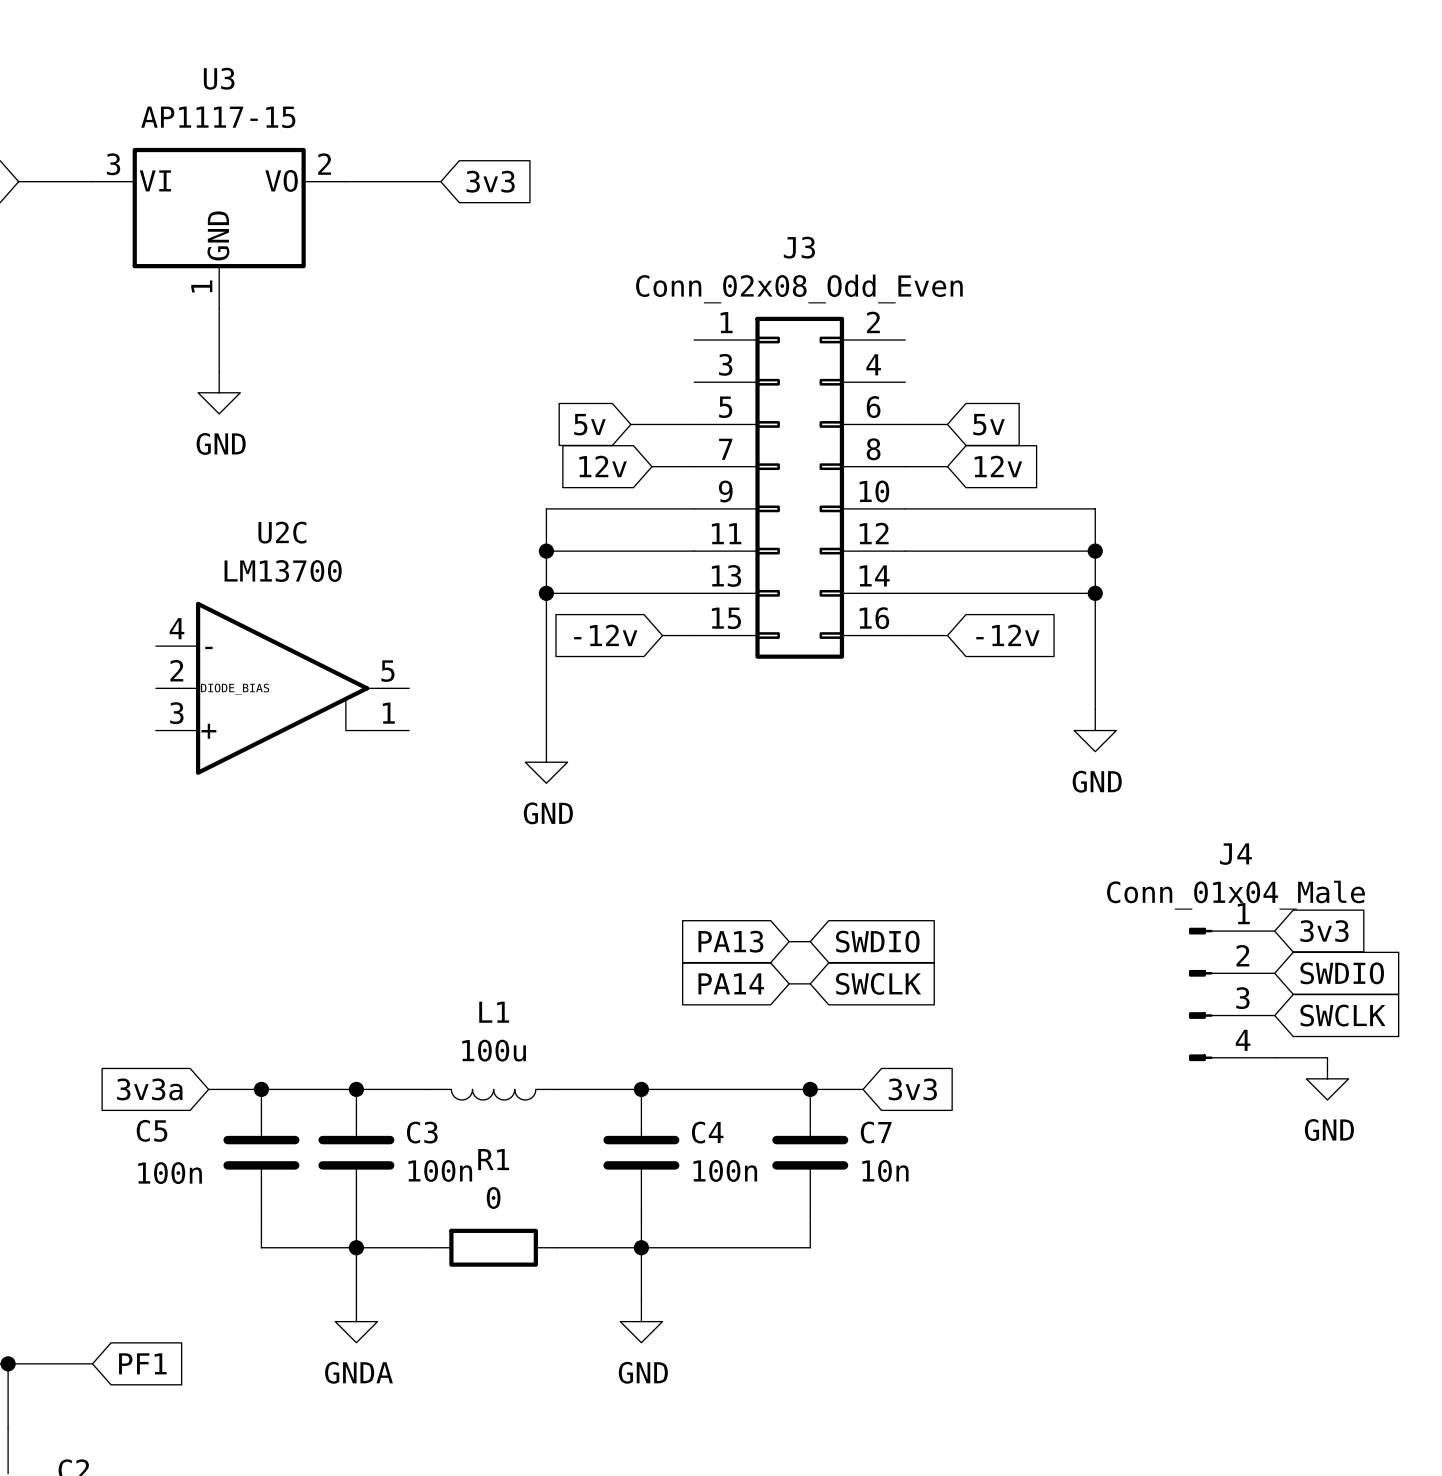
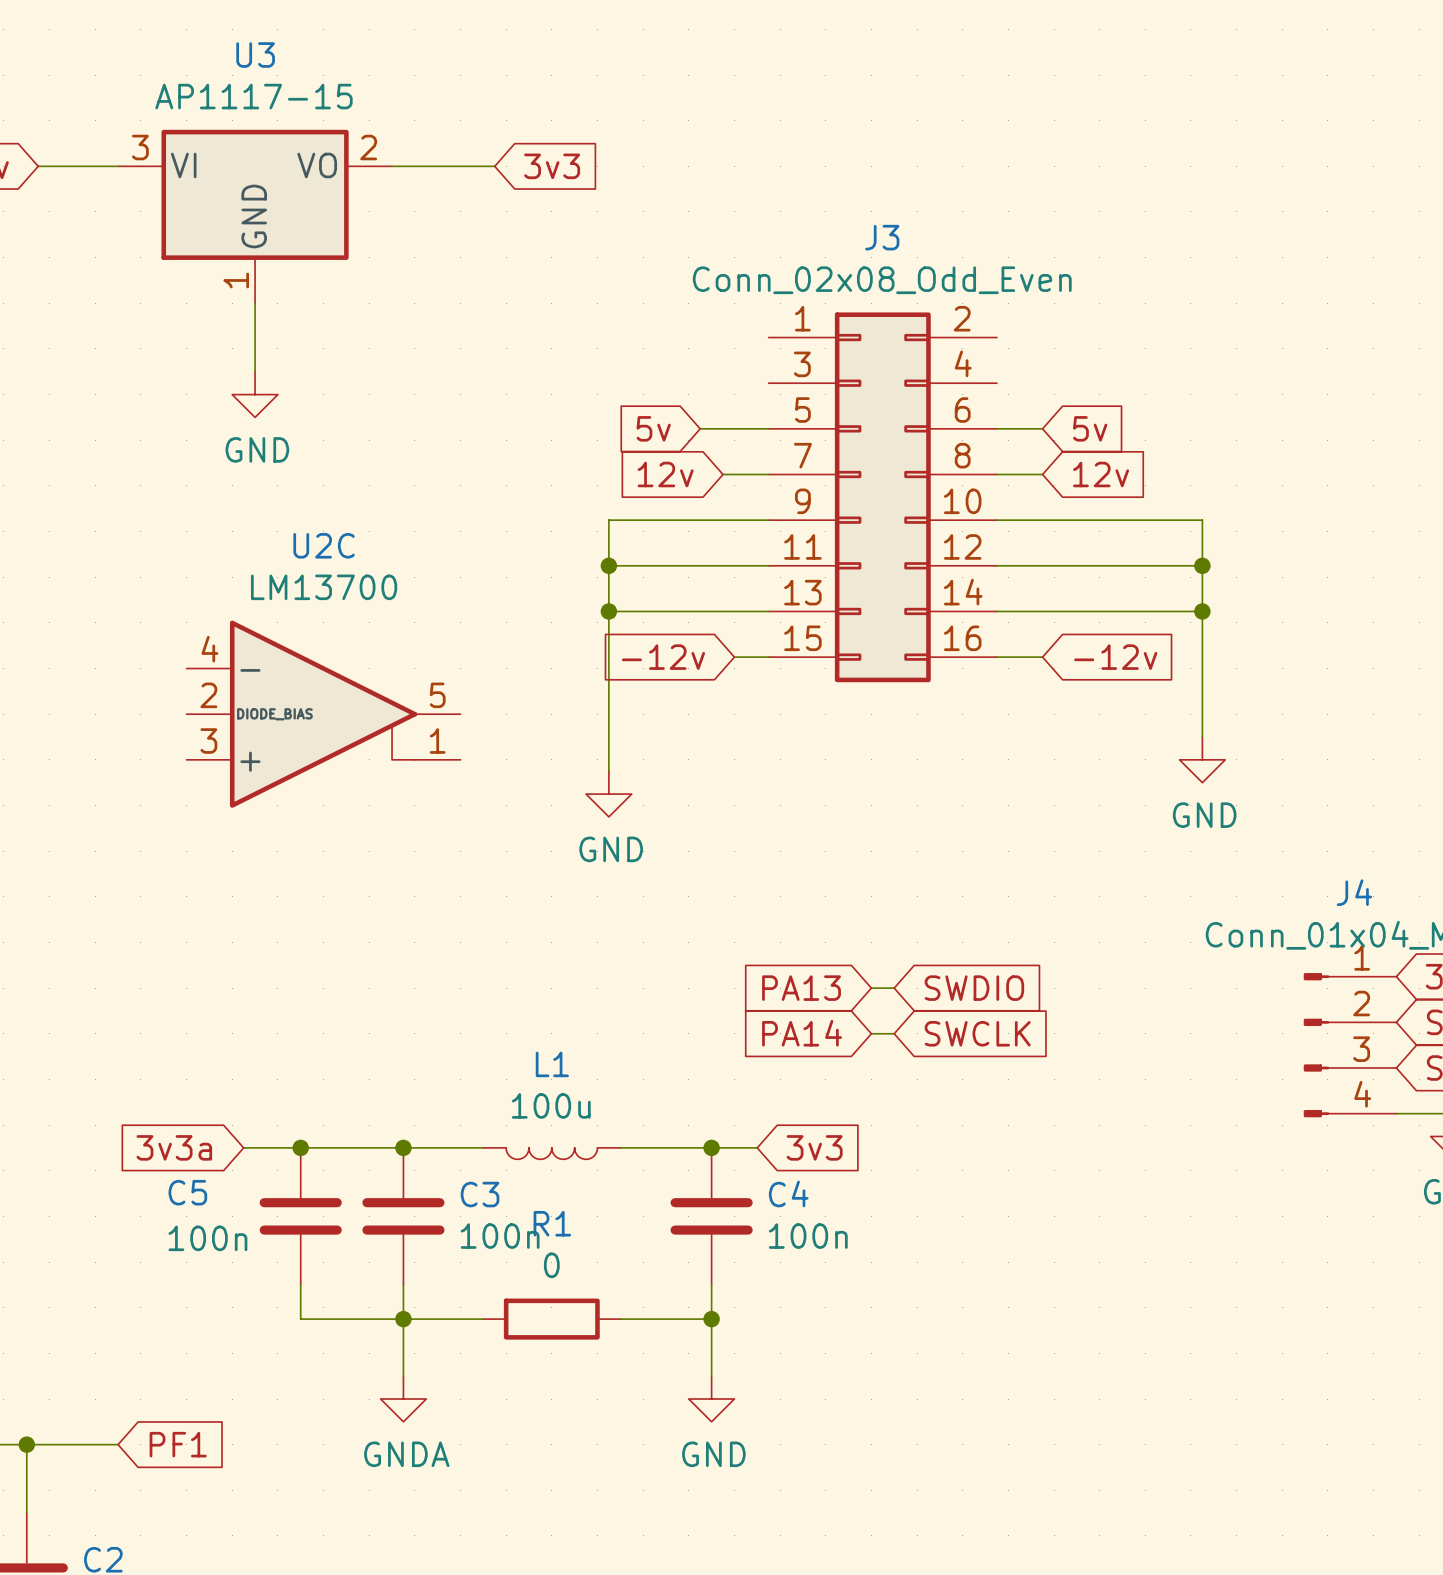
wire: (683, 1089) (863, 1089) -> none
junction: (810, 1089) -> none
global label position: 3v3 (912, 1089) -> 3v3 (814, 1147)
C7: 10n (810, 1152) -> none
wire: (810, 1216) (810, 1247) (641, 1247) -> none

